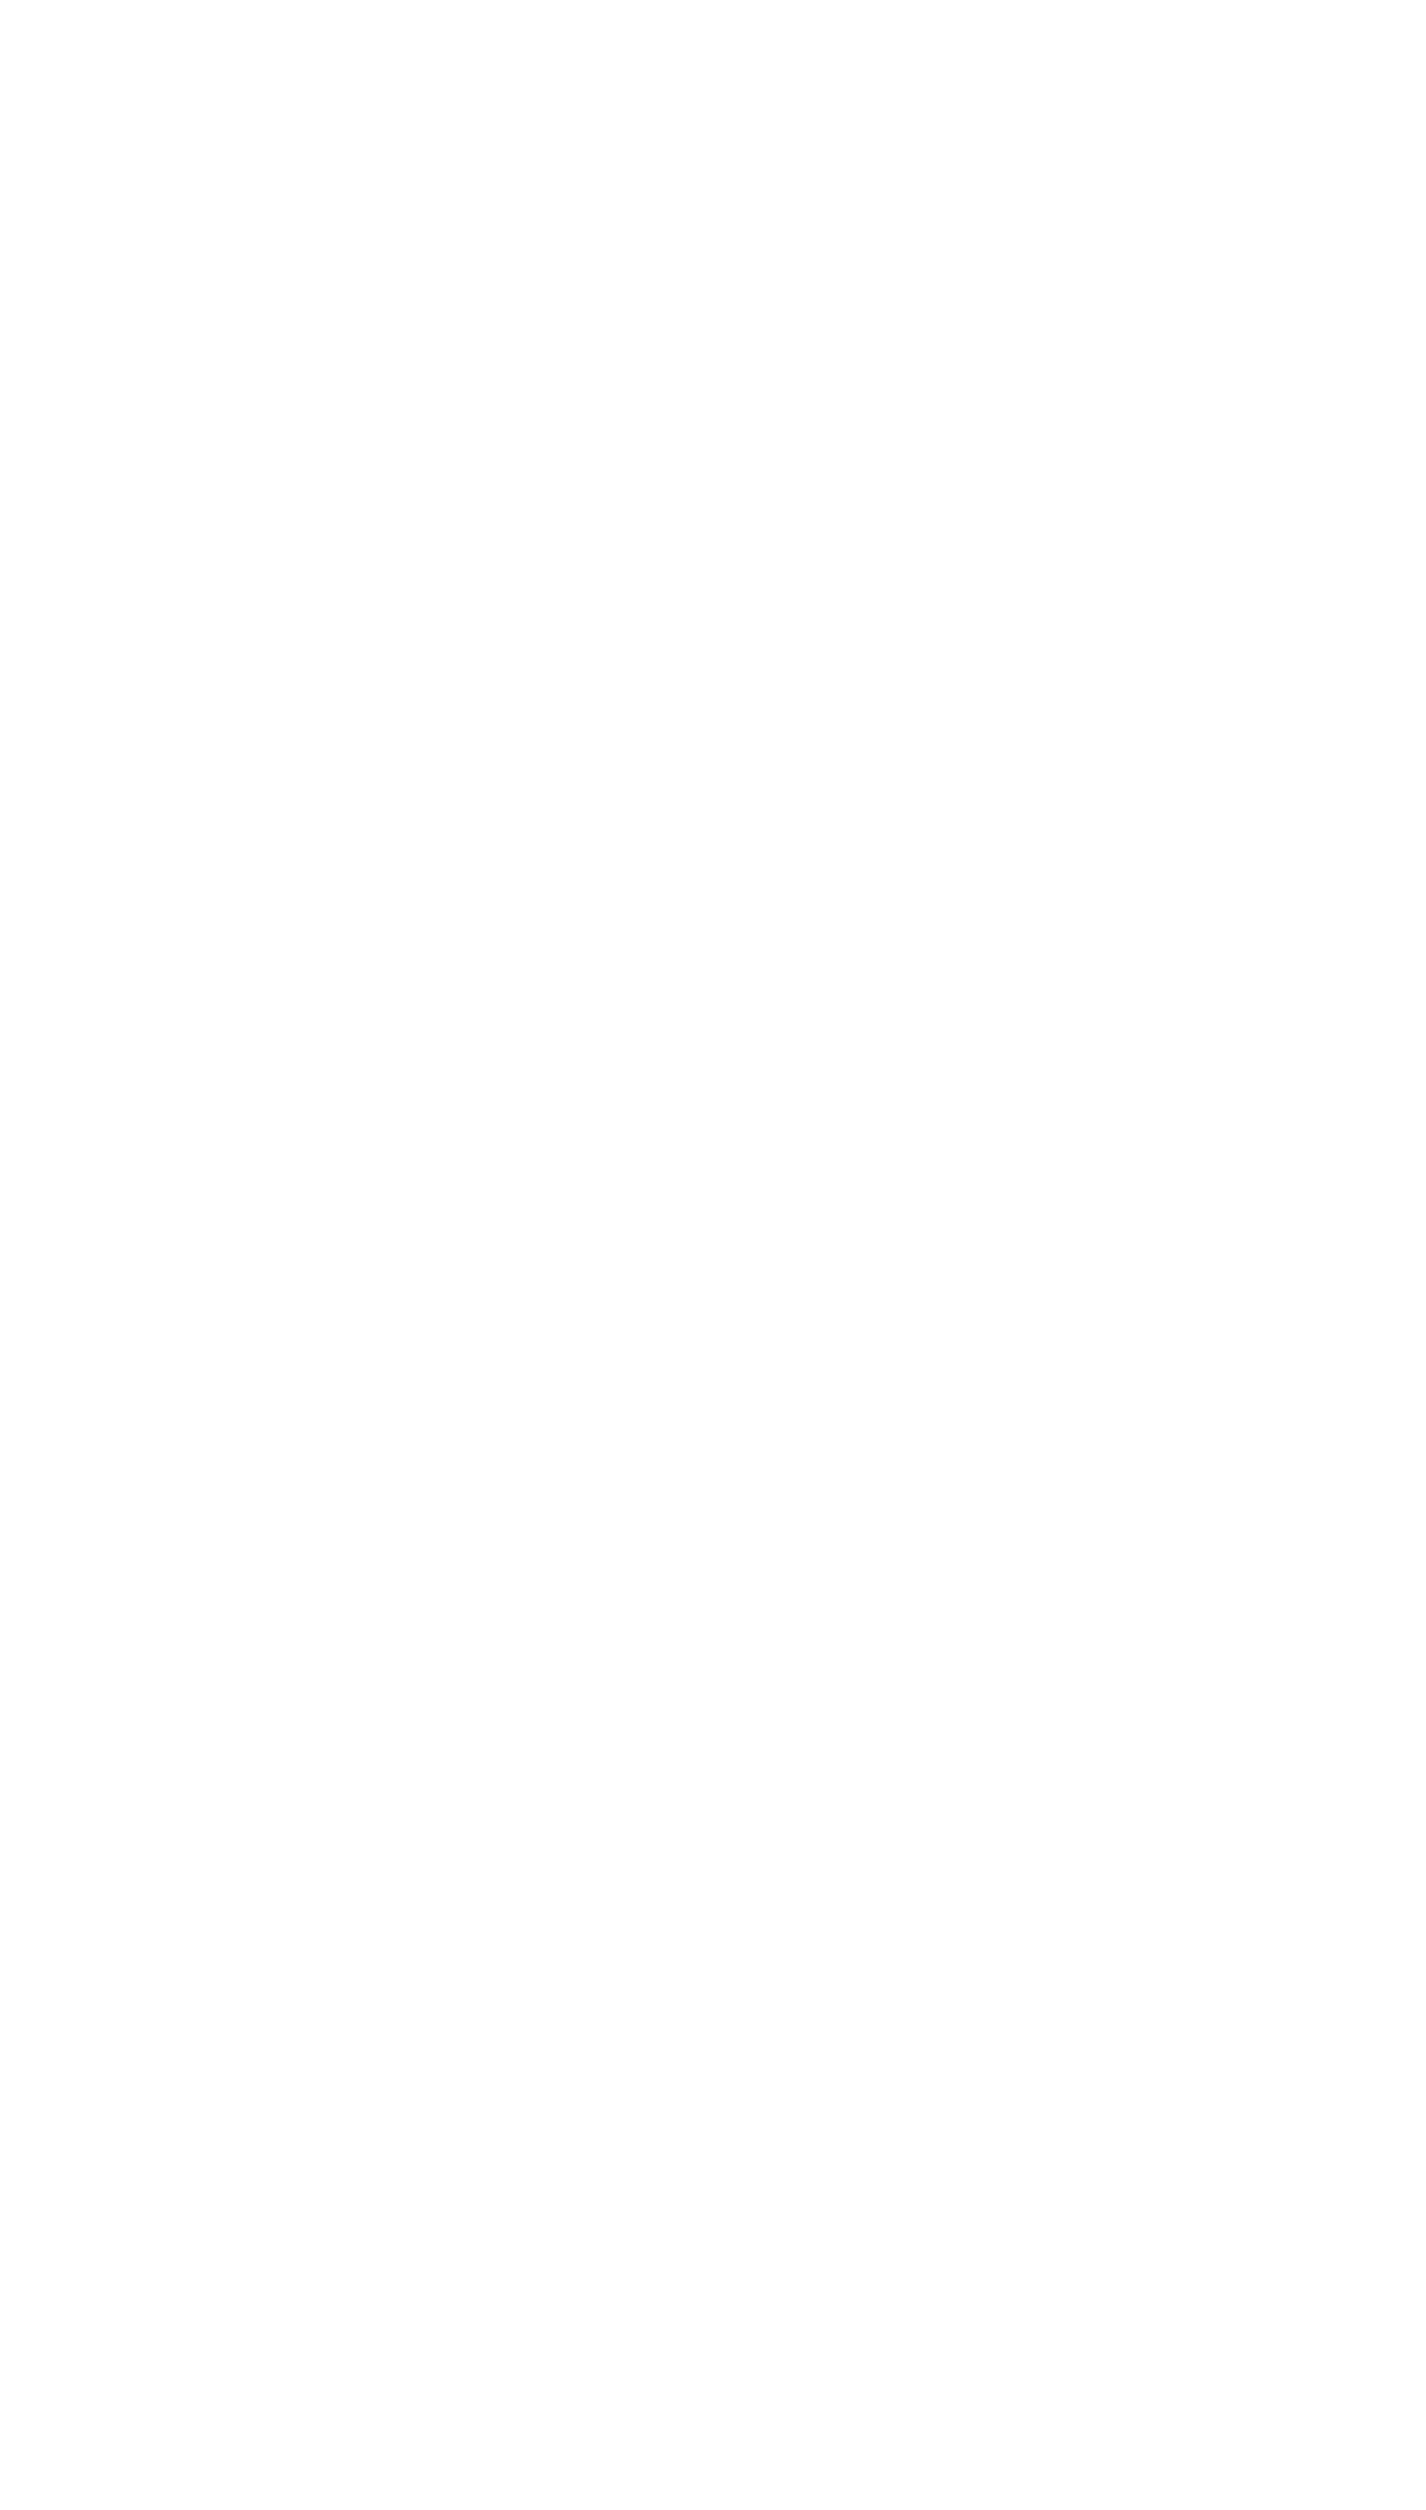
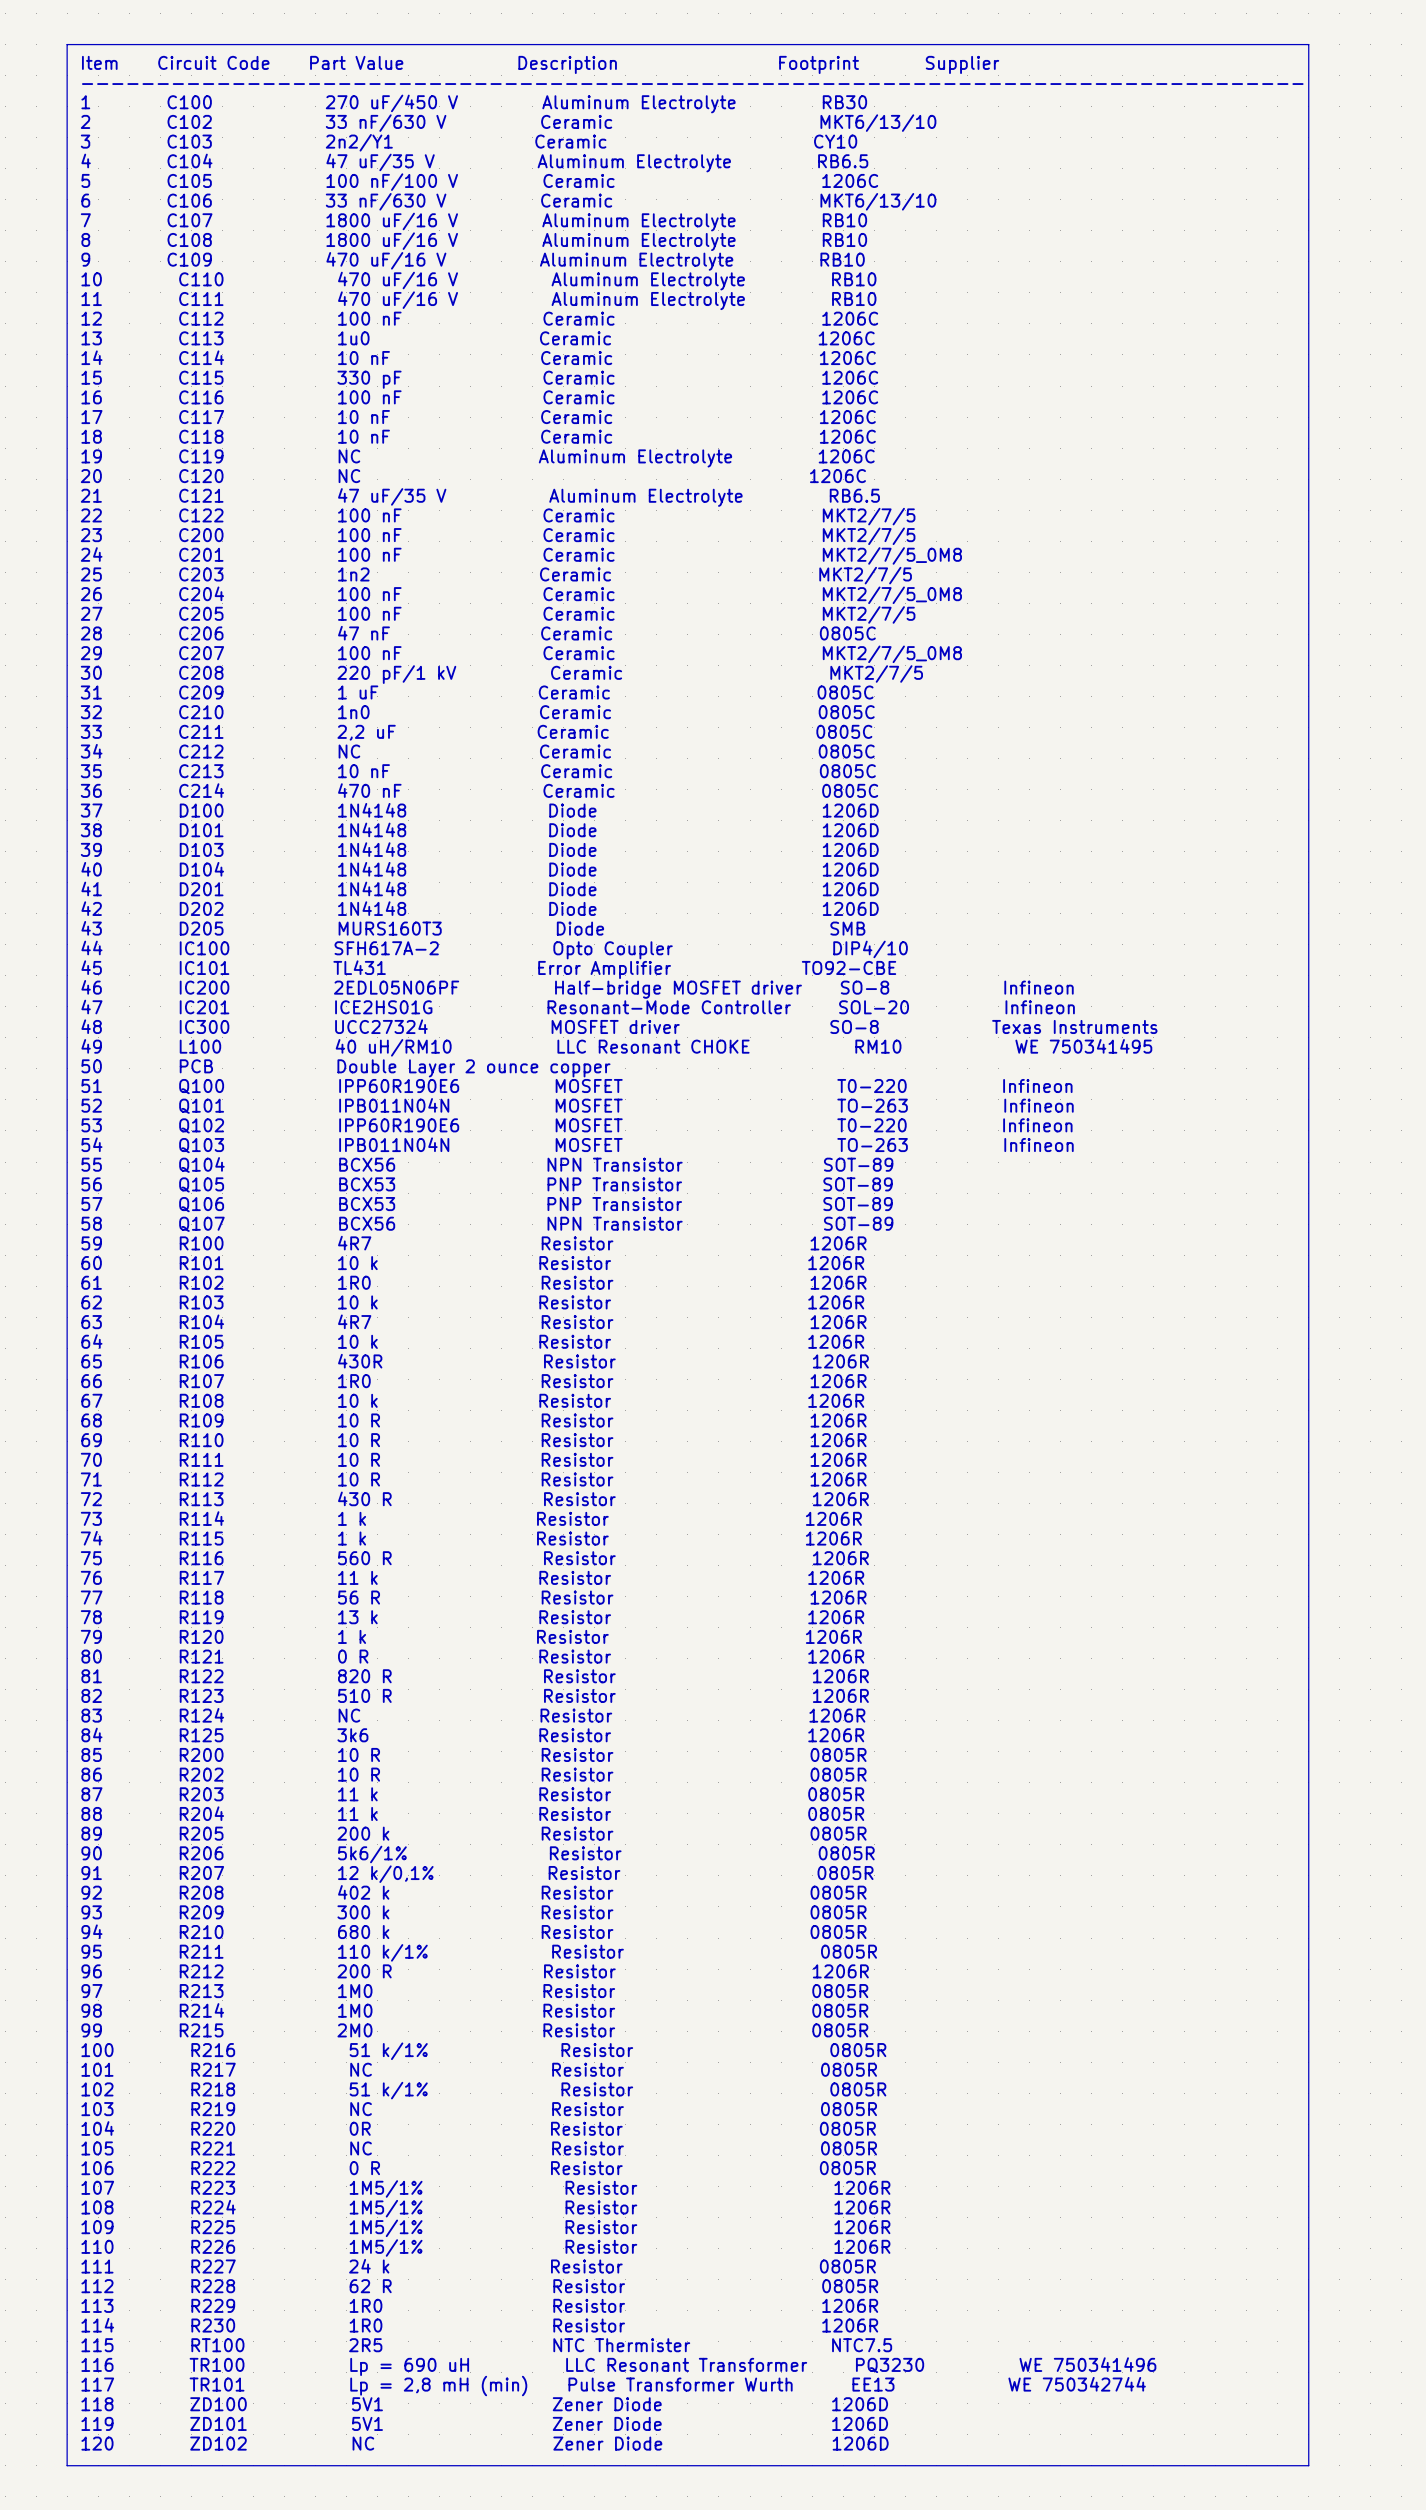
line: none -> (67, 44) (1308, 44) (1308, 2465) (67, 2465) (67, 44)
text: none -> Item Circuit Code Part Value Description Footprint Supplier (540, 64)
text: none -> --------------------------------------------------------------------------------- (692, 84)
text: none -> 1 C100 270 uF/450 V Aluminum Electrolyte RB30 (474, 103)
text: none -> 2 C102 33 nF/630 V Ceramic MKT6/13/10 (508, 123)
text: none -> 3 C103 2n2/Y1 Ceramic CY10 (469, 142)
text: none -> 4 C104 47 uF/35 V Aluminum Electrolyte RB6.5 (474, 163)
text: none -> 5 C105 100 nF/100 V Ceramic 1206C (479, 182)
text: none -> 6 C106 33 nF/630 V Ceramic MKT6/13/10 (508, 201)
text: none -> 7 C107 1800 uF/16 V Aluminum Electrolyte RB10 (473, 222)
text: none -> 8 C108 1800 uF/16 V Aluminum Electrolyte RB10 (474, 241)
text: none -> 9 C109 470 uF/16 V Aluminum Electrolyte RB10 (473, 261)
text: none -> 10 C110 470 uF/16 V Aluminum Electrolyte RB10 (478, 281)
text: none -> 11 C111 470 uF/16 V Aluminum Electrolyte RB10 (478, 300)
text: none -> 12 C112 100 nF Ceramic 1206C (479, 318)
text: none -> 13 C113 1u0 Ceramic 1206C (478, 338)
text: none -> 14 C114 10 nF Ceramic 1206C (478, 357)
text: none -> 15 C115 330 pF Ceramic 1206C (479, 379)
text: none -> 16 C116 100 nF Ceramic 1206C (479, 397)
text: none -> 17 C117 10 nF Ceramic 1206C (478, 417)
text: none -> 18 C118 10 nF Ceramic 1206C (478, 436)
text: none -> 19 C119 NC Aluminum Electrolyte 1206C (478, 458)
text: none -> 20 C120 NC 1206C (473, 476)
text: none -> 21 C121 47 uF/35 V Aluminum Electrolyte RB6.5 (480, 497)
text: none -> 22 C122 100 nF Ceramic MKT2/7/5 (498, 516)
text: none -> 23 C200 100 nF Ceramic MKT2/7/5 (498, 536)
text: none -> 24 C201 100 nF Ceramic MKT2/7/5_0M8 (521, 555)
text: none -> 25 C203 1n2 Ceramic MKT2/7/5 (496, 575)
text: none -> 26 C204 100 nF Ceramic MKT2/7/5_0M8 (521, 595)
text: none -> 27 C205 100 nF Ceramic MKT2/7/5 (498, 614)
text: none -> 28 C206 47 nF Ceramic 0805C (478, 633)
text: none -> 29 C207 100 nF Ceramic MKT2/7/5_0M8 (521, 654)
text: none -> 30 C208 220 pF/1 kV Ceramic MKT2/7/5 (501, 674)
text: none -> 31 C209 1 uF Ceramic 0805C (477, 692)
text: none -> 32 C210 1n0 Ceramic 0805C (477, 712)
text: none -> 33 C211 2,2 uF Ceramic 0805C (476, 732)
text: none -> 34 C212 NC Ceramic 0805C (477, 751)
text: none -> 35 C213 10 nF Ceramic 0805C (478, 771)
text: none -> 36 C214 470 nF Ceramic 0805C (479, 790)
text: none -> 37 D100 1N4148 Diode 1206D (479, 810)
text: none -> 38 D101 1N4148 Diode 1206D (479, 829)
text: none -> 39 D103 1N4148 Diode 1206D (479, 849)
text: none -> 40 D104 1N4148 Diode 1206D (480, 869)
text: none -> 41 D201 1N4148 Diode 1206D (480, 888)
text: none -> 42 D202 1N4148 Diode 1206D (480, 908)
text: none -> 43 D205 MURS160T3 Diode SMB (473, 928)
text: none -> 44 IC100 SFH617A-2 Opto Coupler DIP4/10 (494, 950)
text: none -> 45 IC101 TL431 Error Amplifier TO92-CBE (488, 969)
text: none -> 46 IC200 2EDL05N06PF Half-bridge MOSFET driver SO-8 Infineon (577, 989)
text: none -> 47 IC201 ICE2HS01G Resonant-Mode Controller SOL-20 Infineon (578, 1007)
text: none -> 48 IC300 UCC27324 MOSFET driver SO-8 Texas Instruments (619, 1026)
text: none -> 49 L100 40 uH/RM10 LLC Resonant CHOKE RM10 WE 750341495 (616, 1047)
text: none -> 50 PCB Double Layer 2 ounce copper (345, 1068)
text: none -> 51 Q100 IPP60R190E6 MOSFET T0-220 Infineon (576, 1086)
text: none -> 52 Q101 IPB011N04N MOSFET TO-263 Infineon (577, 1105)
text: none -> 53 Q102 IPP60R190E6 MOSFET T0-220 Infineon (576, 1125)
text: none -> 54 Q103 IPB011N04N MOSFET TO-263 Infineon (577, 1145)
text: none -> 55 Q104 BCX56 NPN Transistor SOT-89 (487, 1165)
text: none -> 56 Q105 BCX53 PNP Transistor SOT-89 (487, 1184)
text: none -> 57 Q106 BCX53 PNP Transistor SOT-89 (487, 1204)
text: none -> 58 Q107 BCX56 NPN Transistor SOT-89 (487, 1224)
text: none -> 59 R100 4R7 Resistor 1206R (473, 1243)
text: none -> 60 R101 10 k Resistor 1206R (472, 1263)
text: none -> 61 R102 1R0 Resistor 1206R (473, 1282)
text: none -> 62 R103 10 k Resistor 1206R (472, 1302)
text: none -> 63 R104 4R7 Resistor 1206R (473, 1321)
text: none -> 64 R105 10 k Resistor 1206R (472, 1341)
text: none -> 65 R106 430R Resistor 1206R (475, 1361)
text: none -> 66 R107 1R0 Resistor 1206R (473, 1381)
text: none -> 67 R108 10 k Resistor 1206R (472, 1400)
text: none -> 68 R109 10 R Resistor 1206R (473, 1420)
text: none -> 69 R110 10 R Resistor 1206R (473, 1440)
text: none -> 70 R111 10 R Resistor 1206R (473, 1459)
text: none -> 71 R112 10 R Resistor 1206R (473, 1479)
text: none -> 72 R113 430 R Resistor 1206R (474, 1498)
text: none -> 73 R114 1 k Resistor 1206R (471, 1518)
text: none -> 74 R115 1 k Resistor 1206R (471, 1538)
text: none -> 75 R116 560 R Resistor 1206R (474, 1558)
text: none -> 76 R117 11 k Resistor 1206R (472, 1577)
text: none -> 77 R118 56 R Resistor 1206R (473, 1597)
text: none -> 78 R119 13 k Resistor 1206R (472, 1617)
text: none -> 79 R120 1 k Resistor 1206R (471, 1636)
text: none -> 80 R121 0 R Resistor 1206R (472, 1656)
text: none -> 81 R122 820 R Resistor 1206R (475, 1676)
text: none -> 82 R123 510 R Resistor 1206R (475, 1695)
text: none -> 83 R124 NC Resistor 1206R (473, 1715)
text: none -> 84 R125 3k6 Resistor 1206R (472, 1734)
text: none -> 85 R200 10 R Resistor 0805R (473, 1754)
text: none -> 86 R202 10 R Resistor 0805R (473, 1774)
text: none -> 87 R203 11 k Resistor 0805R (472, 1794)
text: none -> 88 R204 11 k Resistor 0805R (472, 1813)
text: none -> 89 R205 200 k Resistor 0805R (473, 1833)
text: none -> 90 R206 5k6/1% Resistor 0805R (478, 1854)
text: none -> 91 R207 12 k/0,1% Resistor 0805R (477, 1874)
text: none -> 92 R208 402 k Resistor 0805R (473, 1892)
text: none -> 93 R209 300 k Resistor 0805R (473, 1912)
text: none -> 94 R210 680 k Resistor 0805R (473, 1931)
text: none -> 95 R211 110 k/1% Resistor 0805R (479, 1952)
text: none -> 96 R212 200 R Resistor 1206R (475, 1971)
text: none -> 97 R213 1M0 Resistor 0805R (474, 1991)
text: none -> 98 R214 1M0 Resistor 0805R (474, 2010)
text: none -> 99 R215 2M0 Resistor 0805R (474, 2030)
text: none -> 100 R216 51 k/1% Resistor 0805R (483, 2051)
text: none -> 101 R217 NC Resistor 0805R (479, 2069)
text: none -> 102 R218 51 k/1% Resistor 0805R (483, 2090)
text: none -> 103 R219 NC Resistor 0805R (479, 2109)
text: none -> 104 R220 0R Resistor 0805R (478, 2128)
text: none -> 105 R221 NC Resistor 0805R (479, 2148)
text: none -> 106 R222 0 R Resistor 0805R (478, 2168)
text: none -> 107 R223 1M5/1% Resistor 1206R (485, 2188)
text: none -> 108 R224 1M5/1% Resistor 1206R (485, 2208)
text: none -> 109 R225 1M5/1% Resistor 1206R (485, 2228)
text: none -> 110 R226 1M5/1% Resistor 1206R (485, 2248)
text: none -> 111 R227 24 k Resistor 0805R (478, 2266)
text: none -> 112 R228 62 R Resistor 0805R (479, 2286)
text: none -> 113 R229 1R0 Resistor 1206R (479, 2305)
text: none -> 114 R230 1R0 Resistor 1206R (479, 2325)
text: none -> 115 RT100 2R5 NTC Thermister NTC7.5 (486, 2345)
text: none -> 116 TR100 Lp = 690 uH LLC Resonant Transformer PQ3230 WE 750341496 (618, 2366)
text: none -> 117 TR101 Lp = 2,8 mH (min) Pulse Transformer Wurth EE13 WE 750342744 (613, 2386)
text: none -> 118 ZD100 5V1 Zener Diode 1206D (484, 2404)
text: none -> 119 ZD101 5V1 Zener Diode 1206D (484, 2423)
text: none -> 120 ZD102 NC Zener Diode 1206D (485, 2443)

